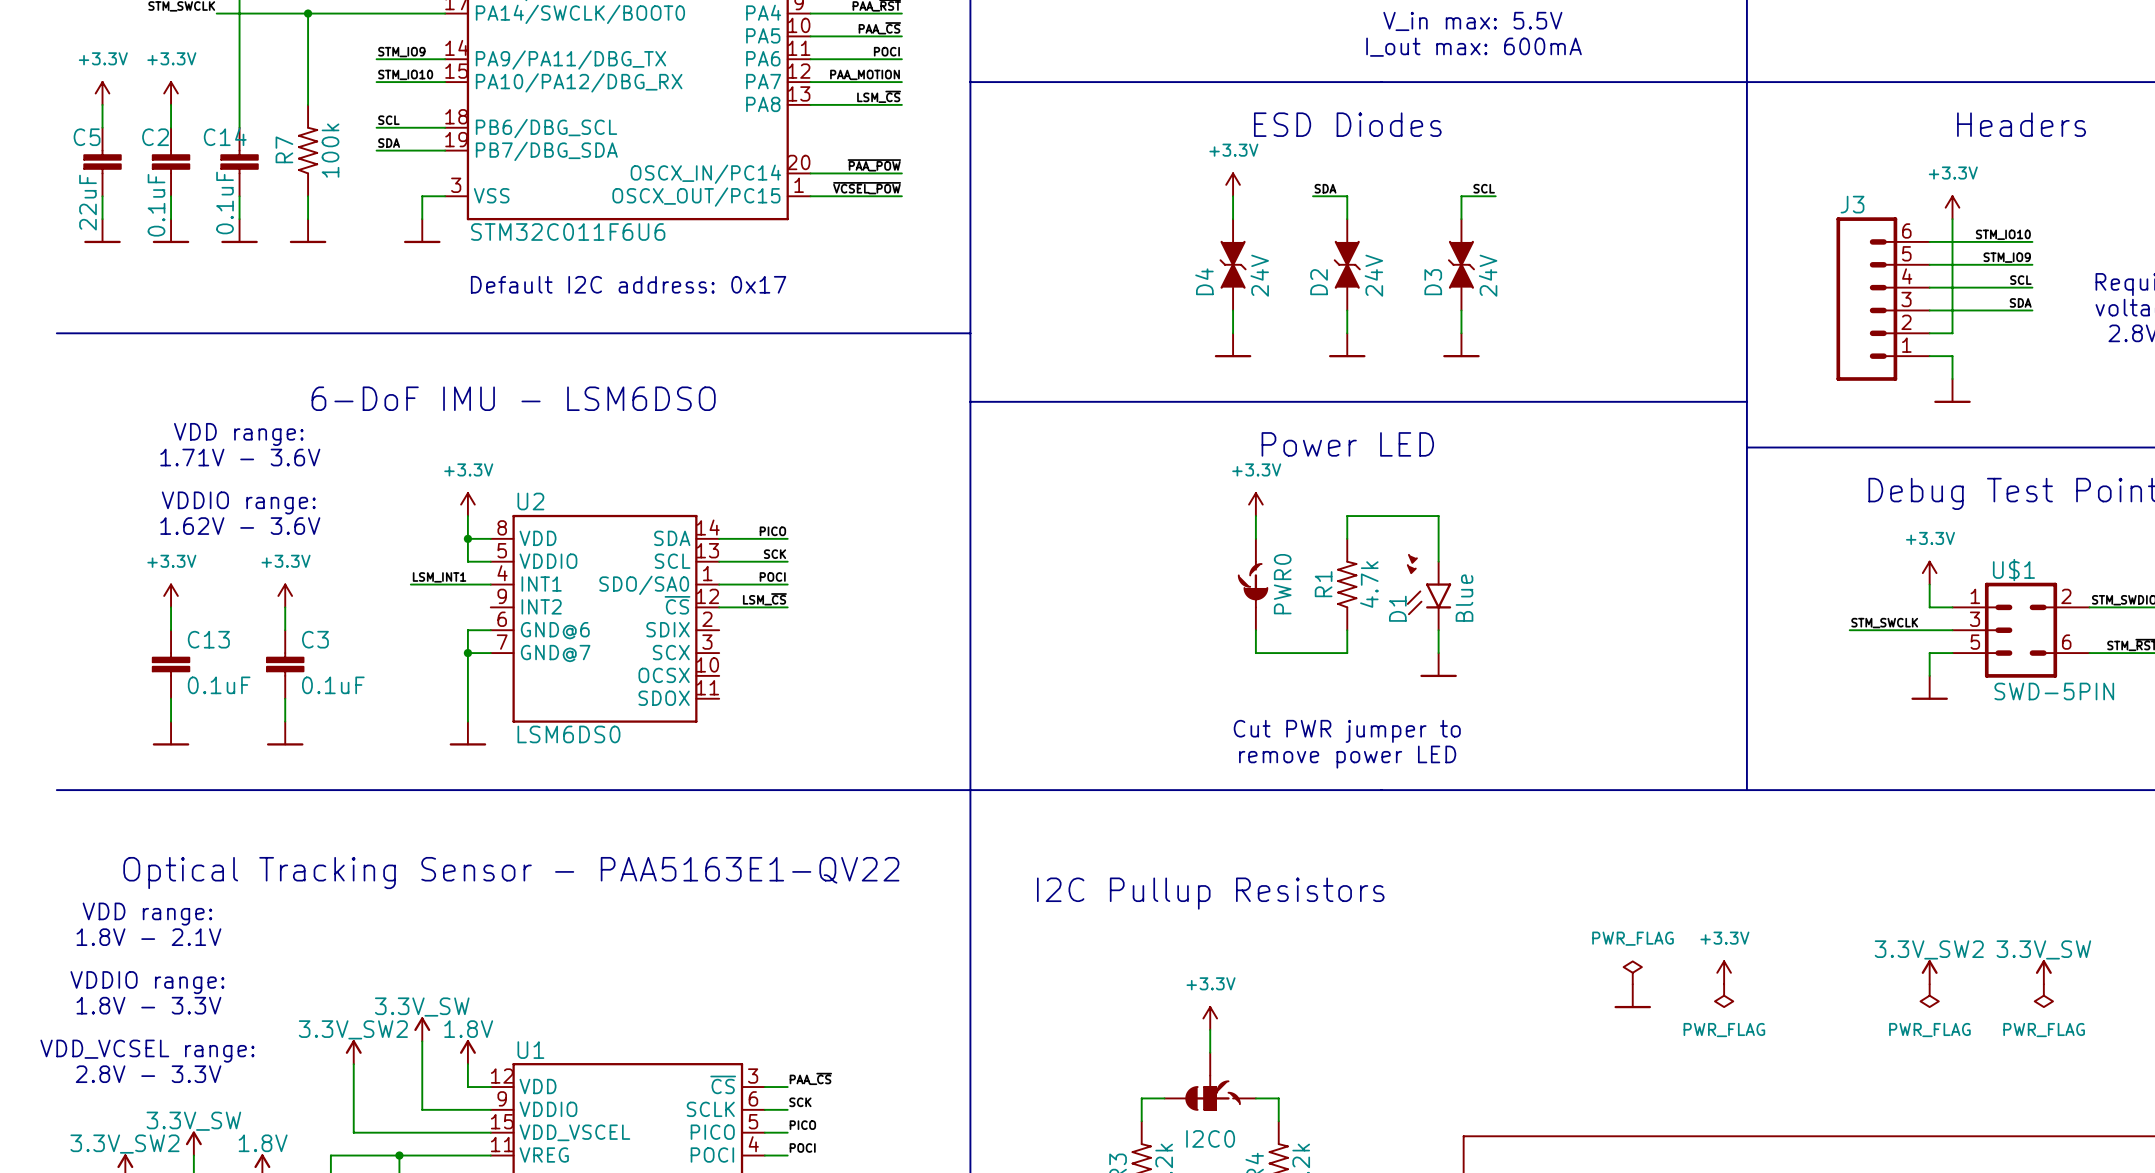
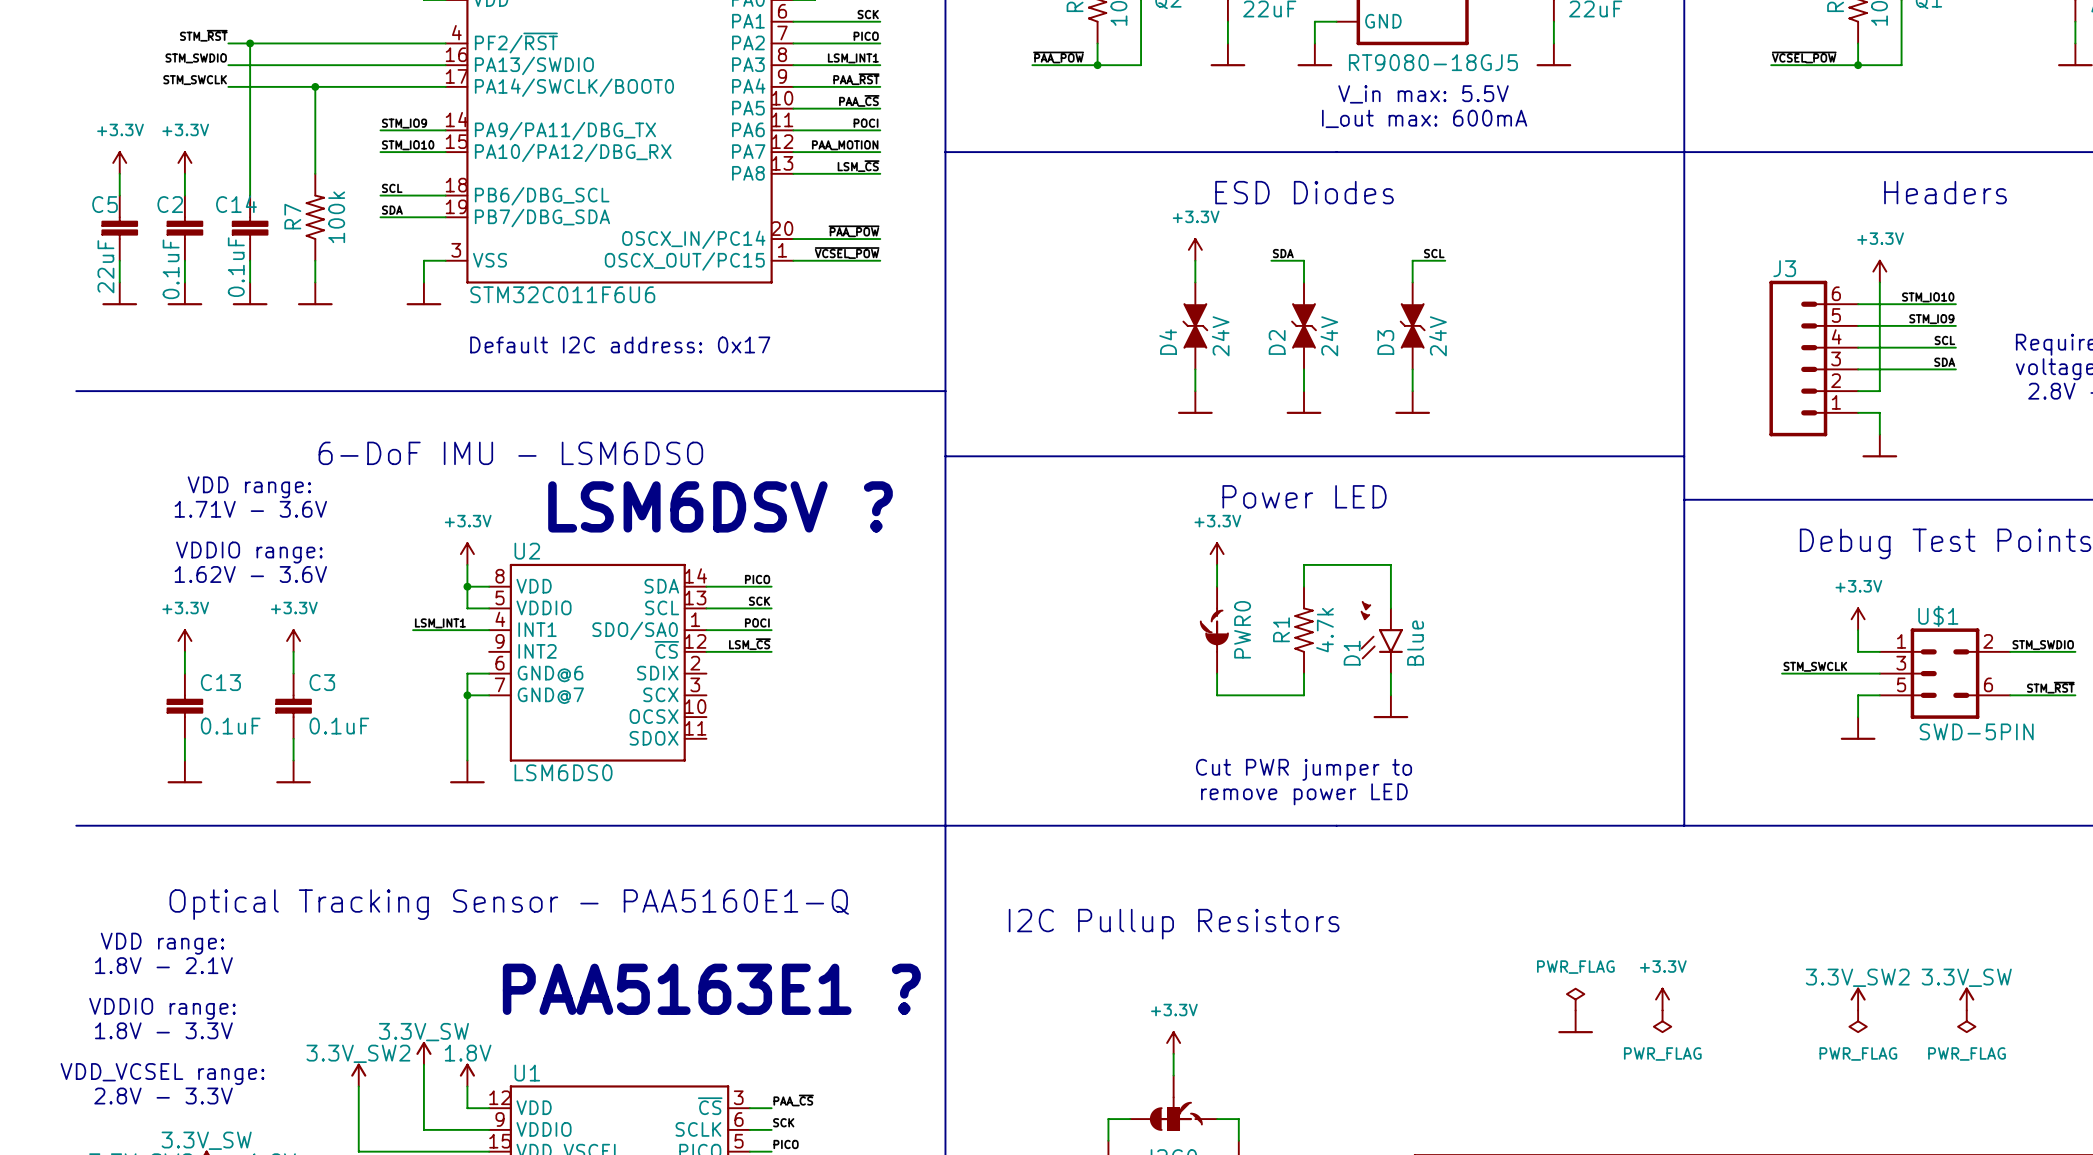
text: none -> LSM6DSV ? (720, 506)
text: Optical Tracking Sensor - PAA5163E1-QV22 (511, 873) -> Optical Tracking Sensor - PAA5160E1-Q (509, 904)
text: none -> PAA5163E1 ? (711, 989)

